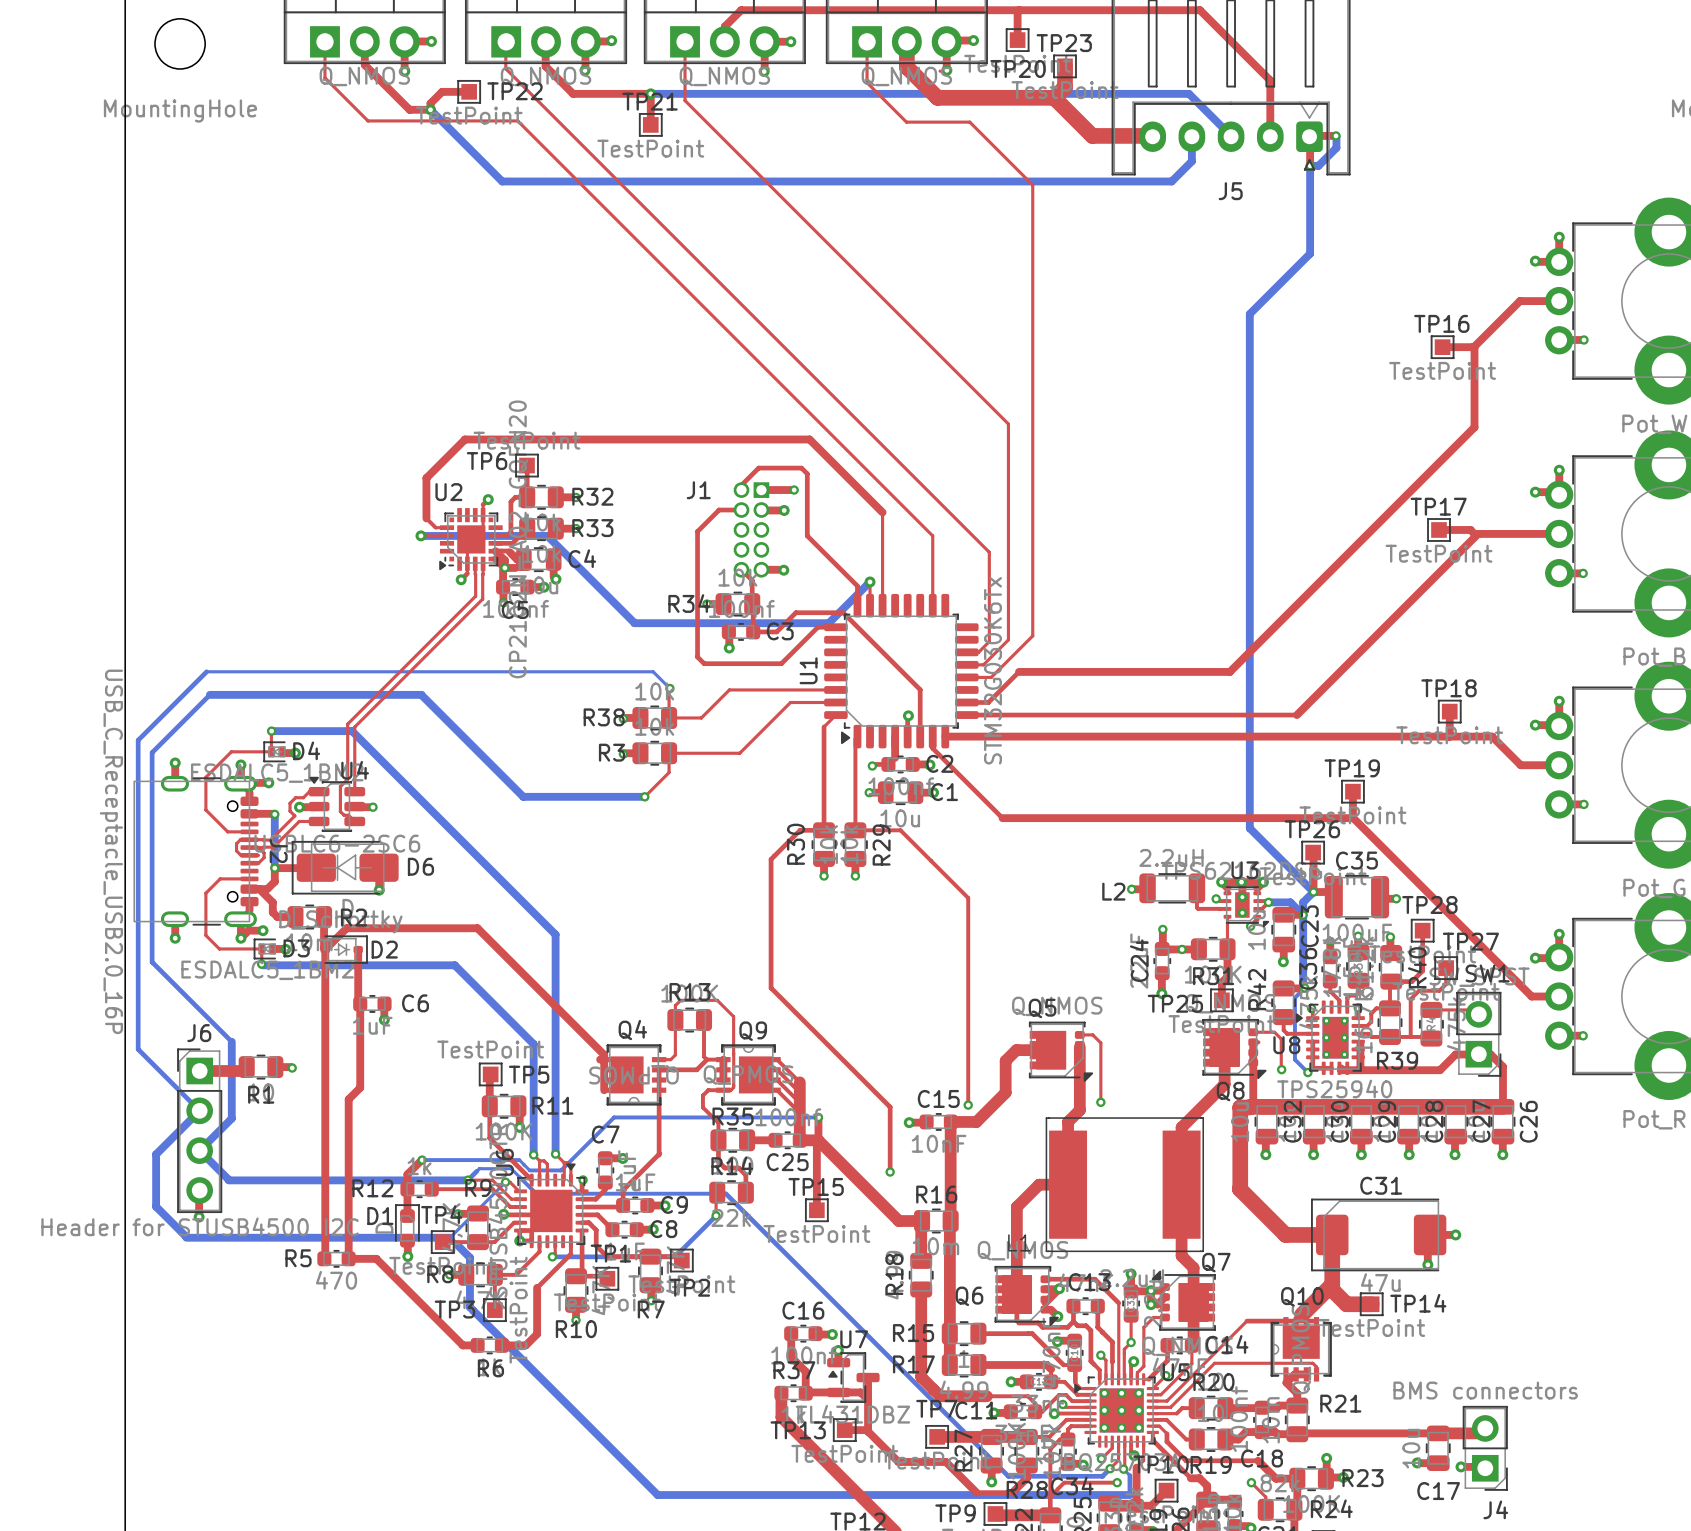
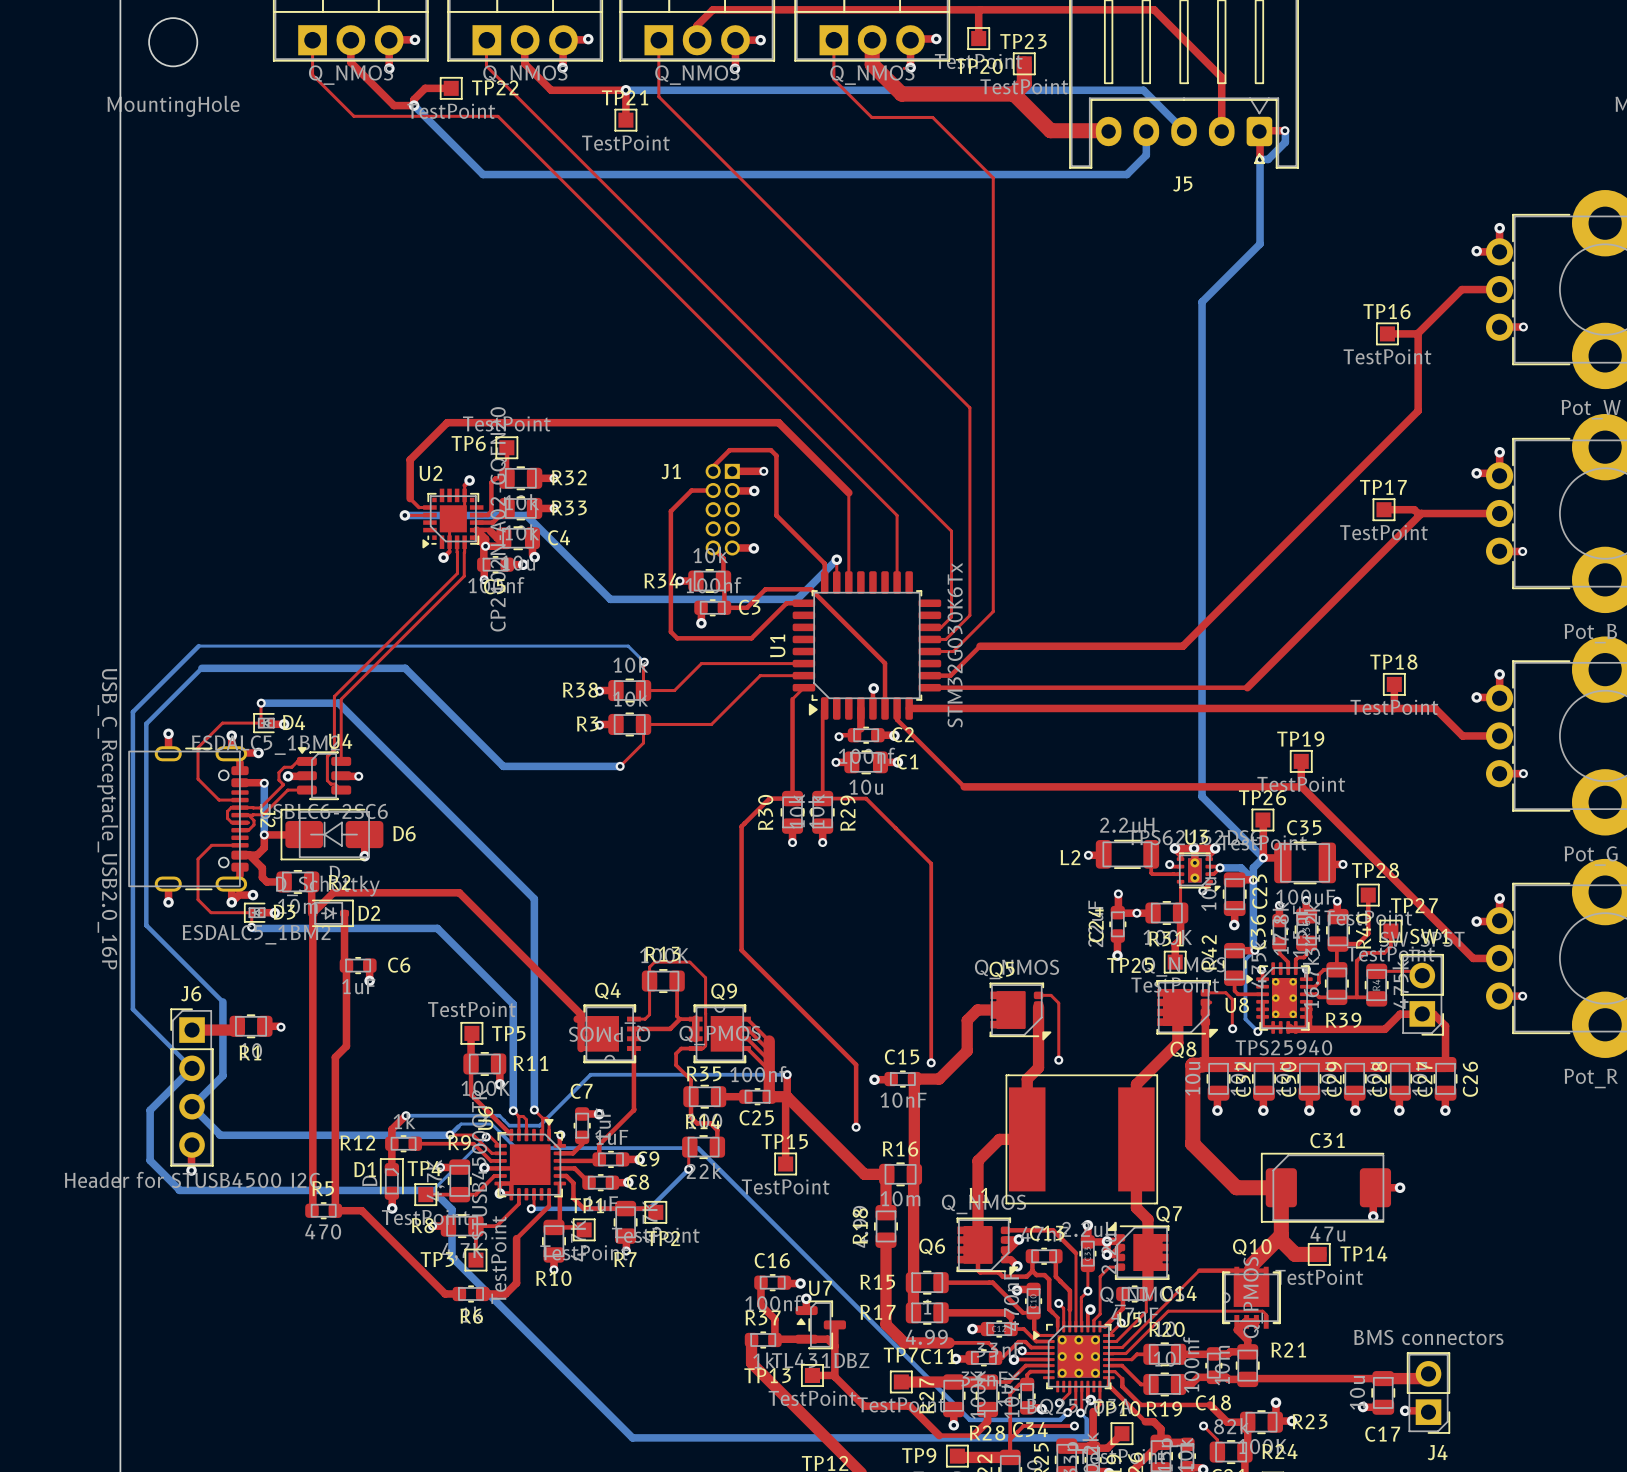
R5 name position: R5 (298, 1258) -> R5 (323, 1188)

